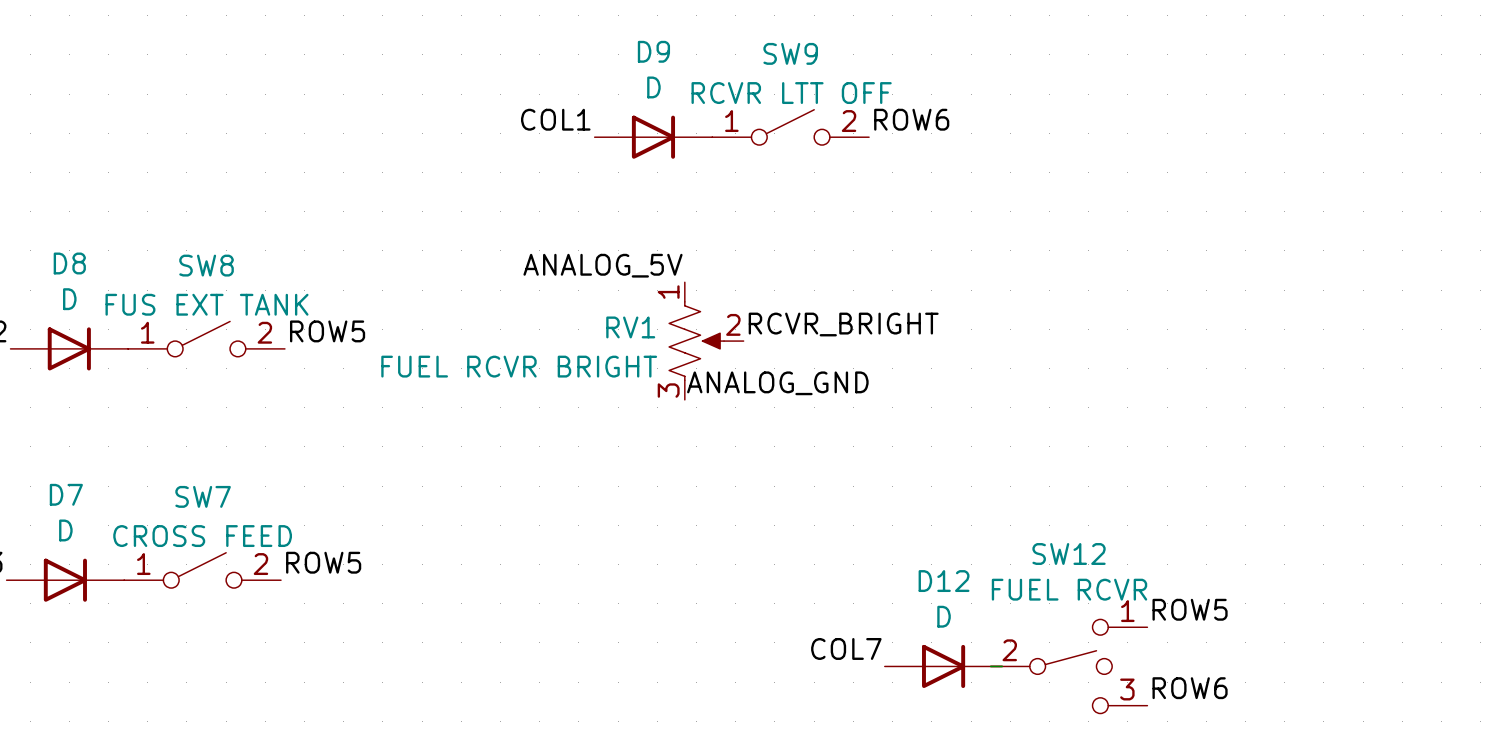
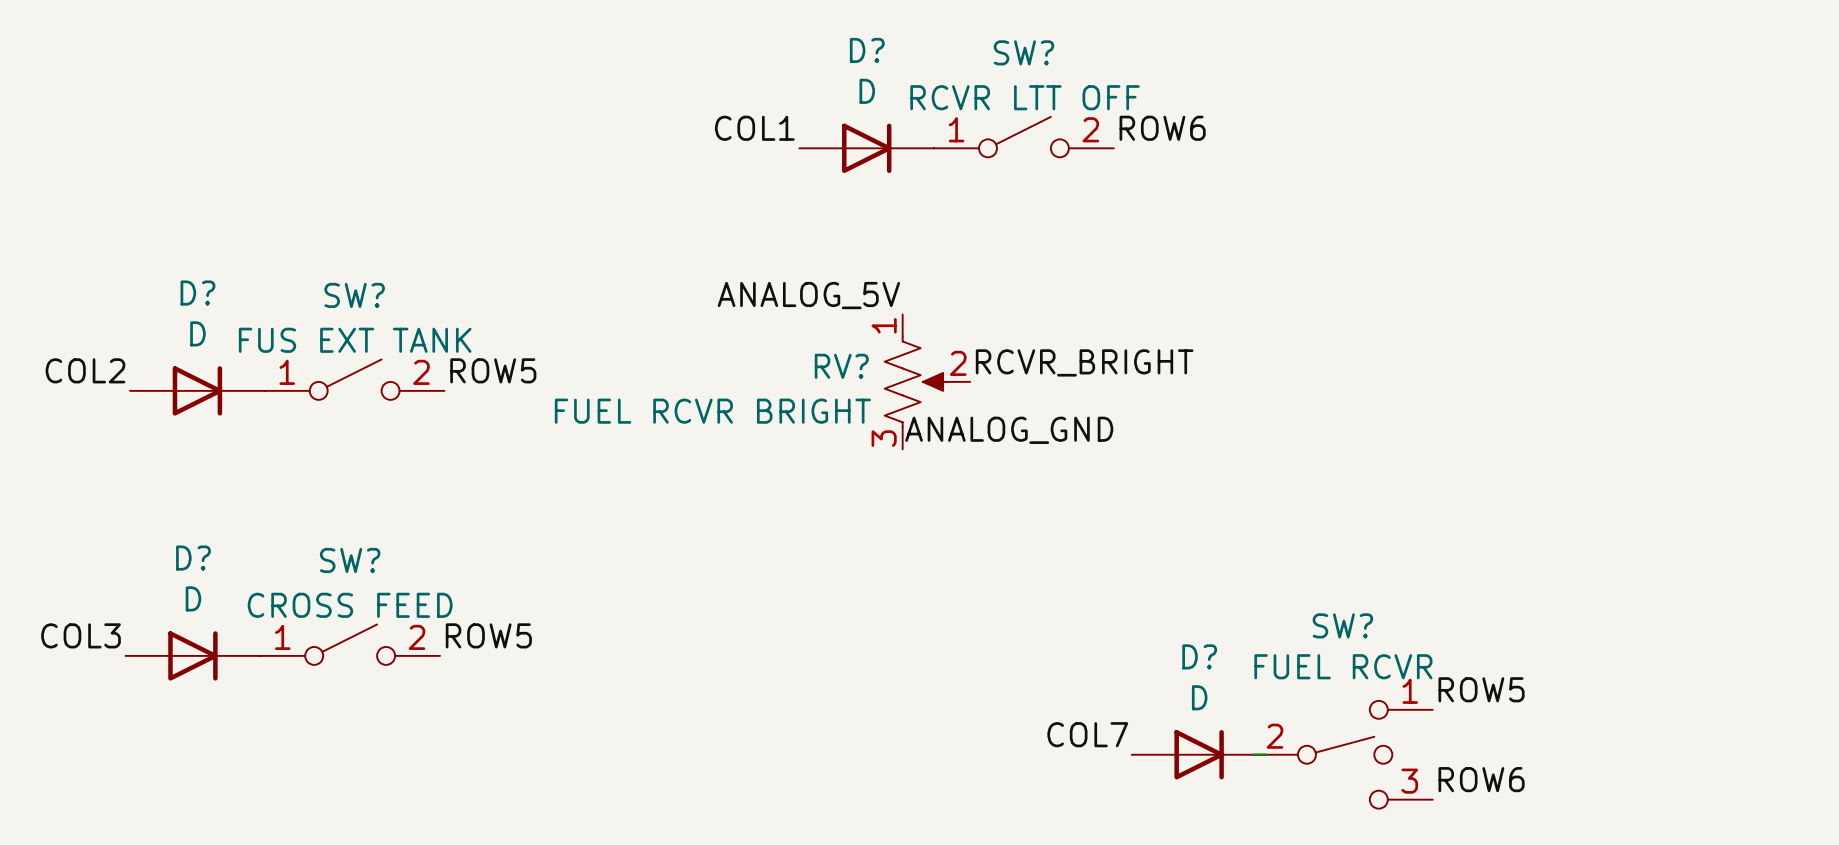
D9 name: D9 (653, 51) -> D? (867, 50)
SW9 name: SW9 (790, 53) -> SW? (1023, 52)
D8 name: D8 (69, 263) -> D? (197, 293)
SW8 name: SW8 (206, 265) -> SW? (354, 295)
RV1 name: RV1 (630, 327) -> RV? (841, 366)
D7 name: D7 (66, 494) -> D? (193, 558)
SW7 name: SW7 (203, 496) -> SW? (350, 560)
SW12 name: SW12 (1069, 553) -> SW? (1342, 625)
D12 name: D12 (944, 581) -> D? (1199, 656)

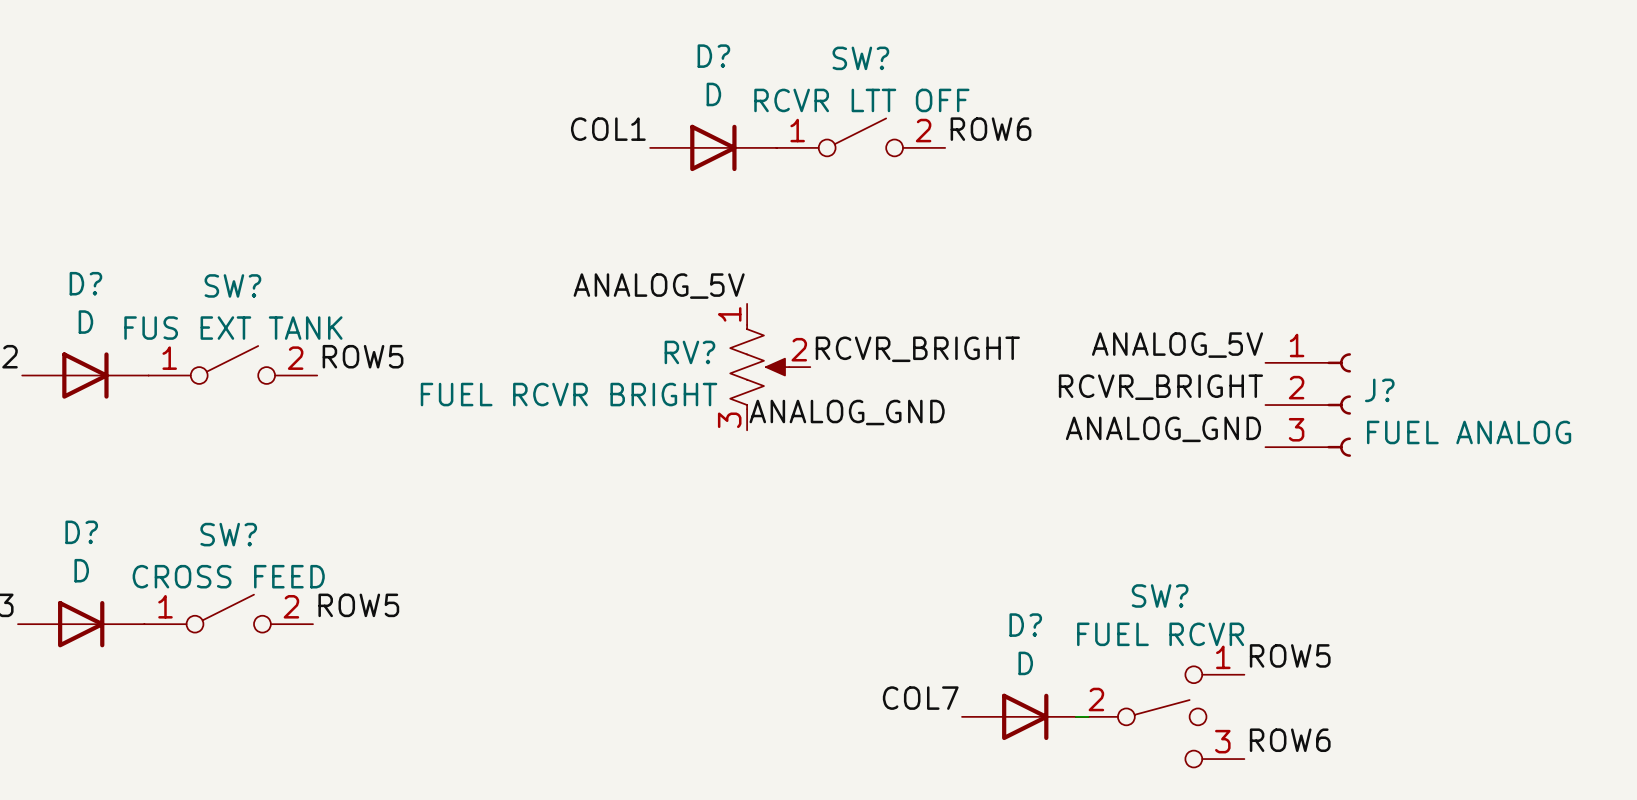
label: none -> ANALOG_5V (1177, 345)
label: none -> RCVR_BRIGHT (1160, 387)
J?: none -> FUEL ANALOG (1308, 405)
label: none -> ANALOG_GND (1163, 429)

